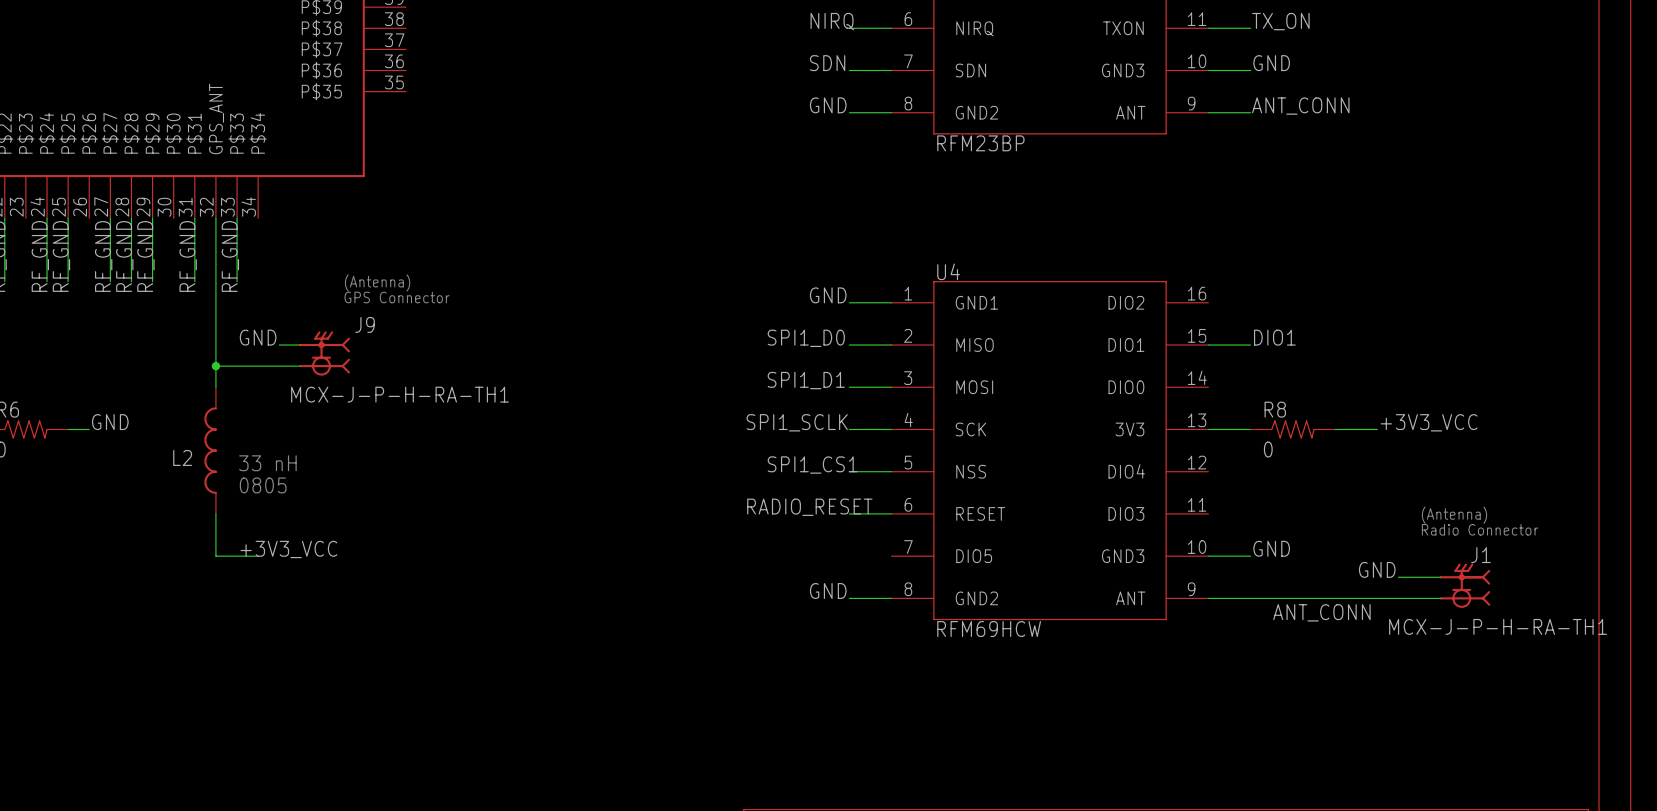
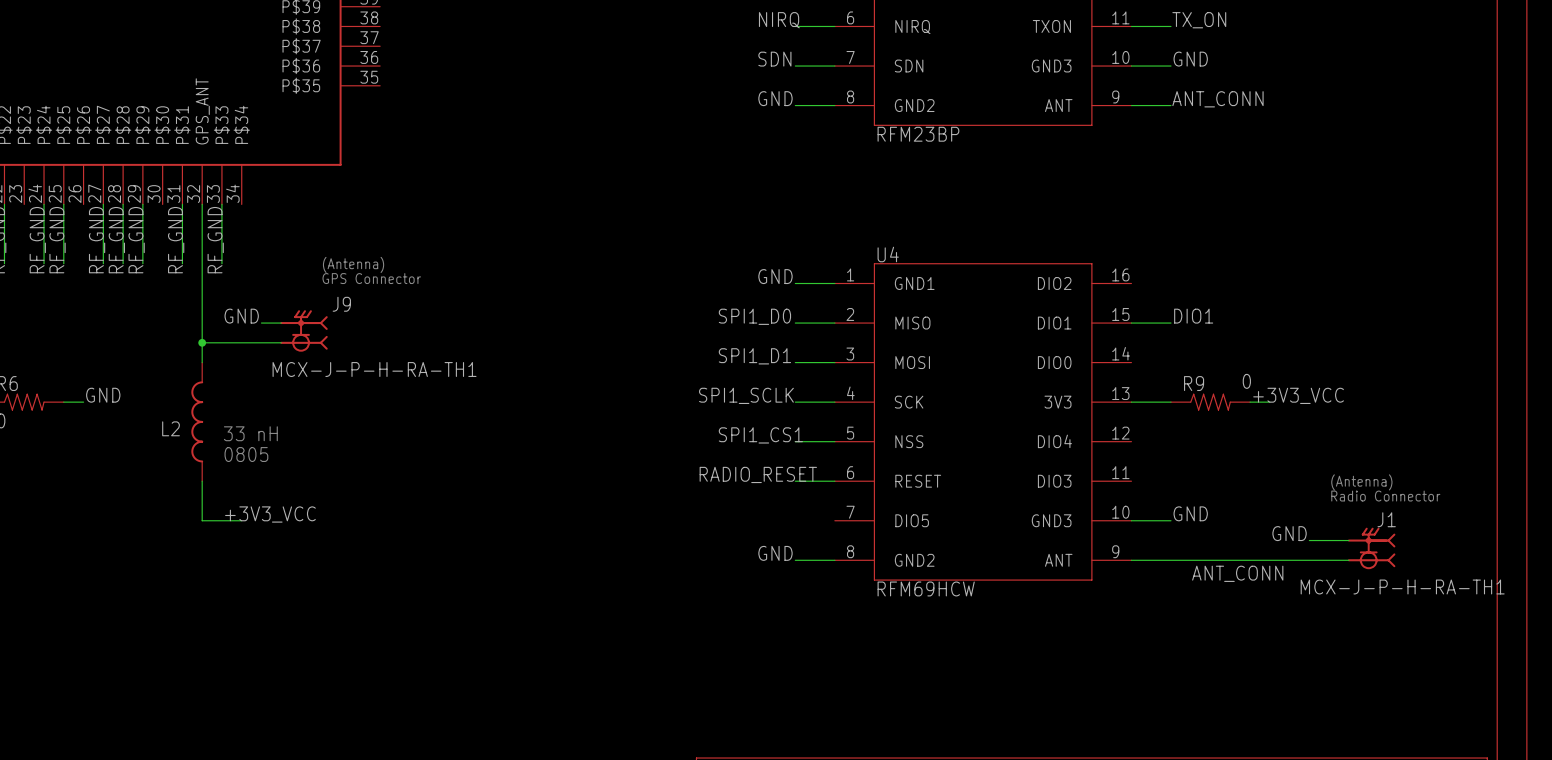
R8 name: R8 (1275, 409) -> R9 (1194, 383)
label position: +3V3_VCC (1429, 422) -> +3V3_VCC (1298, 395)
wire: (1356, 429) (1377, 429) -> none
R8 value position: 0 (1268, 449) -> 0 (1246, 381)

